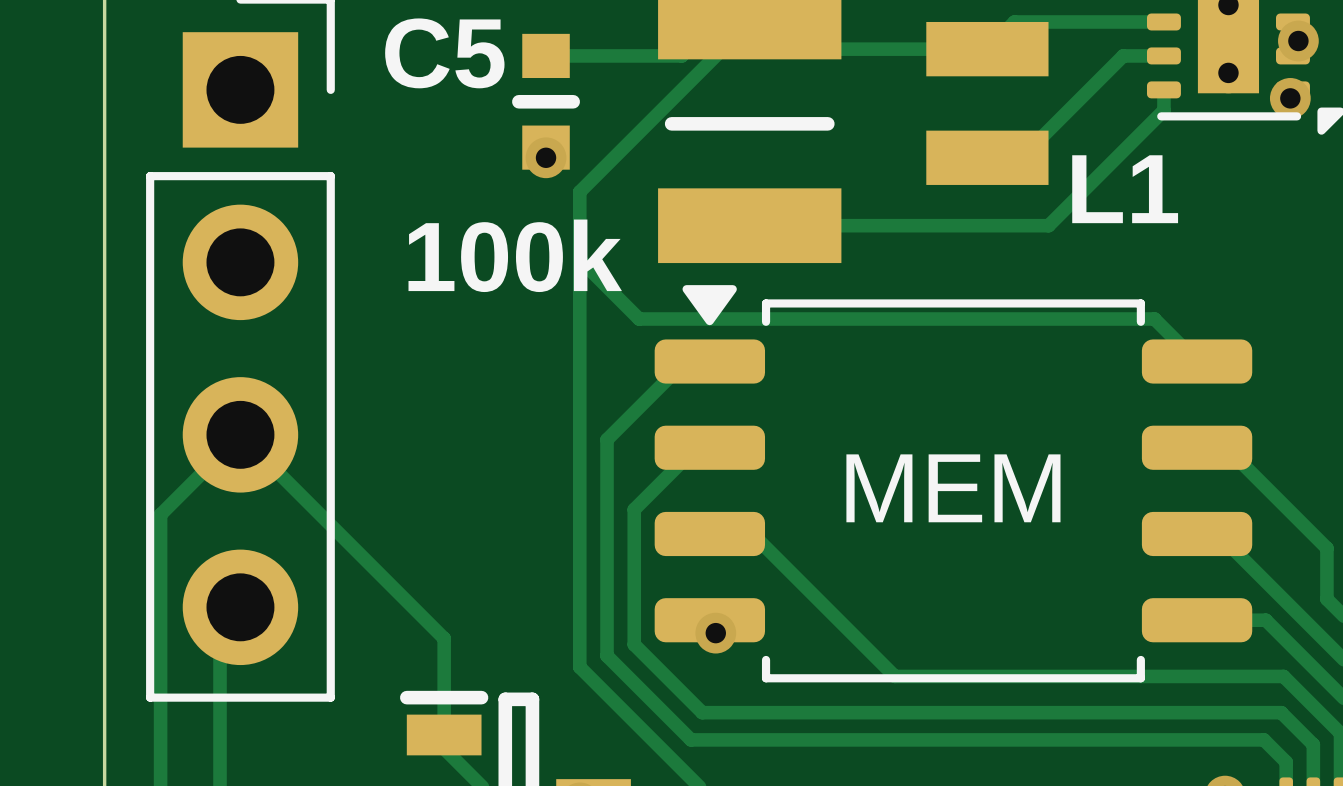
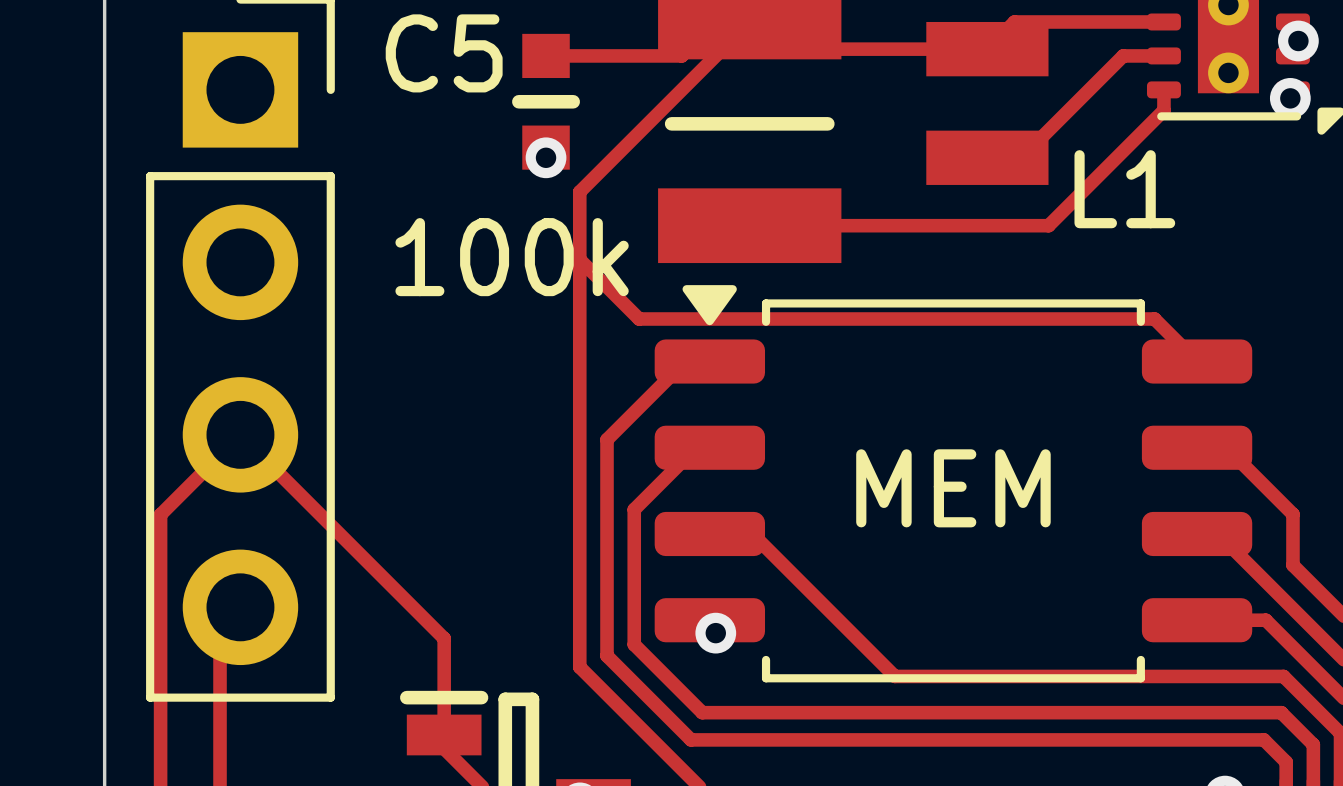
track: (1292, 514) (1326, 548) (1326, 599) -> (1292, 514) (1292, 565) (1326, 599)

